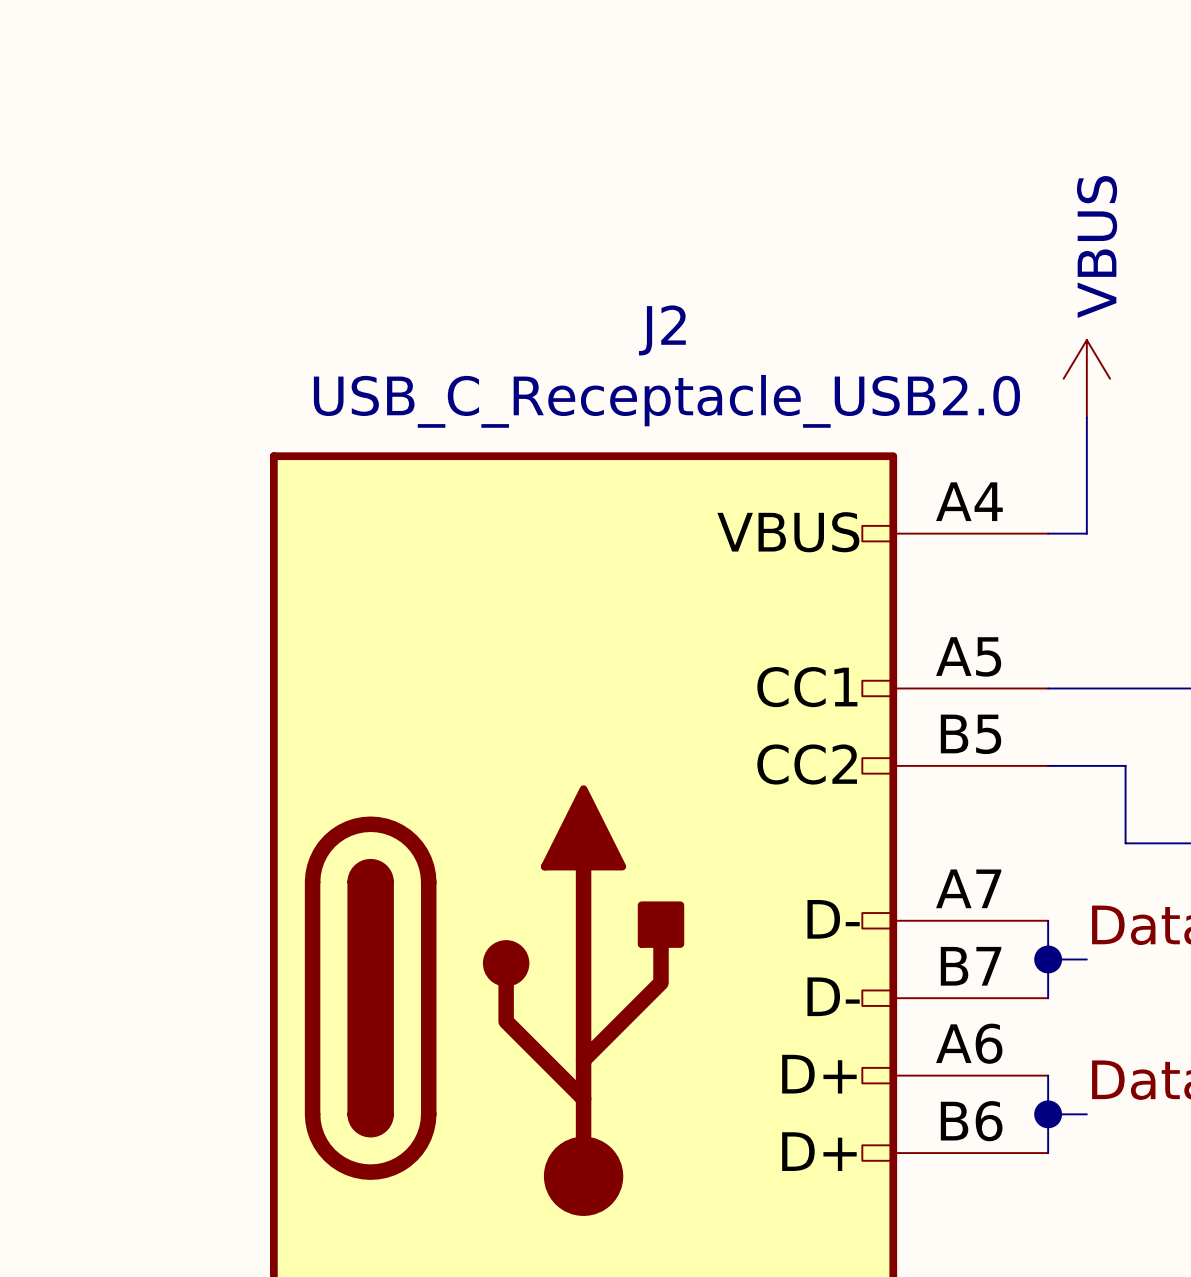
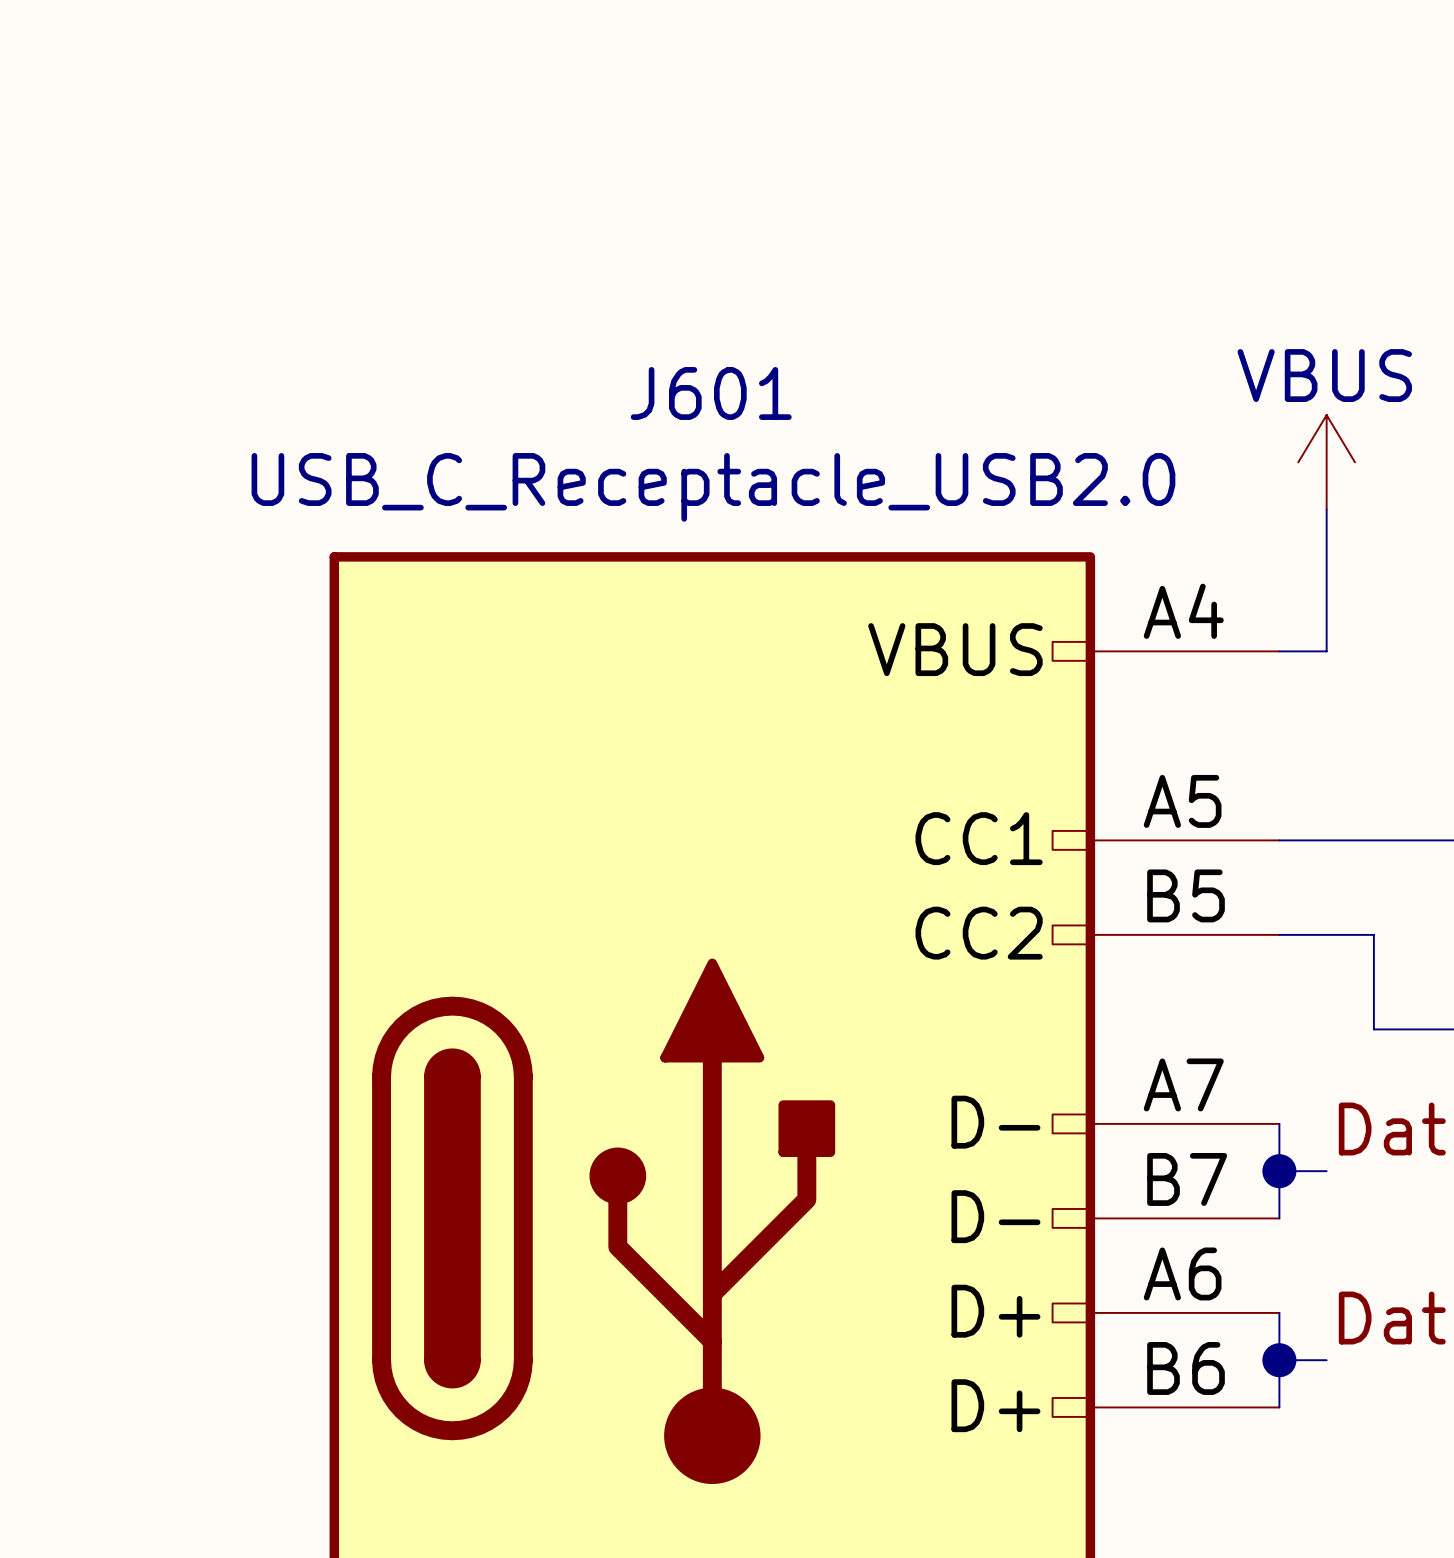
power symbol text rotation: 0° (1097, 247) -> 90° clockwise (1324, 375)
J2 name: J2 (662, 330) -> J601 (711, 393)
J2 value position: USB_C_Receptacle_USB2.0 (666, 401) -> USB_C_Receptacle_USB2.0 (713, 487)

